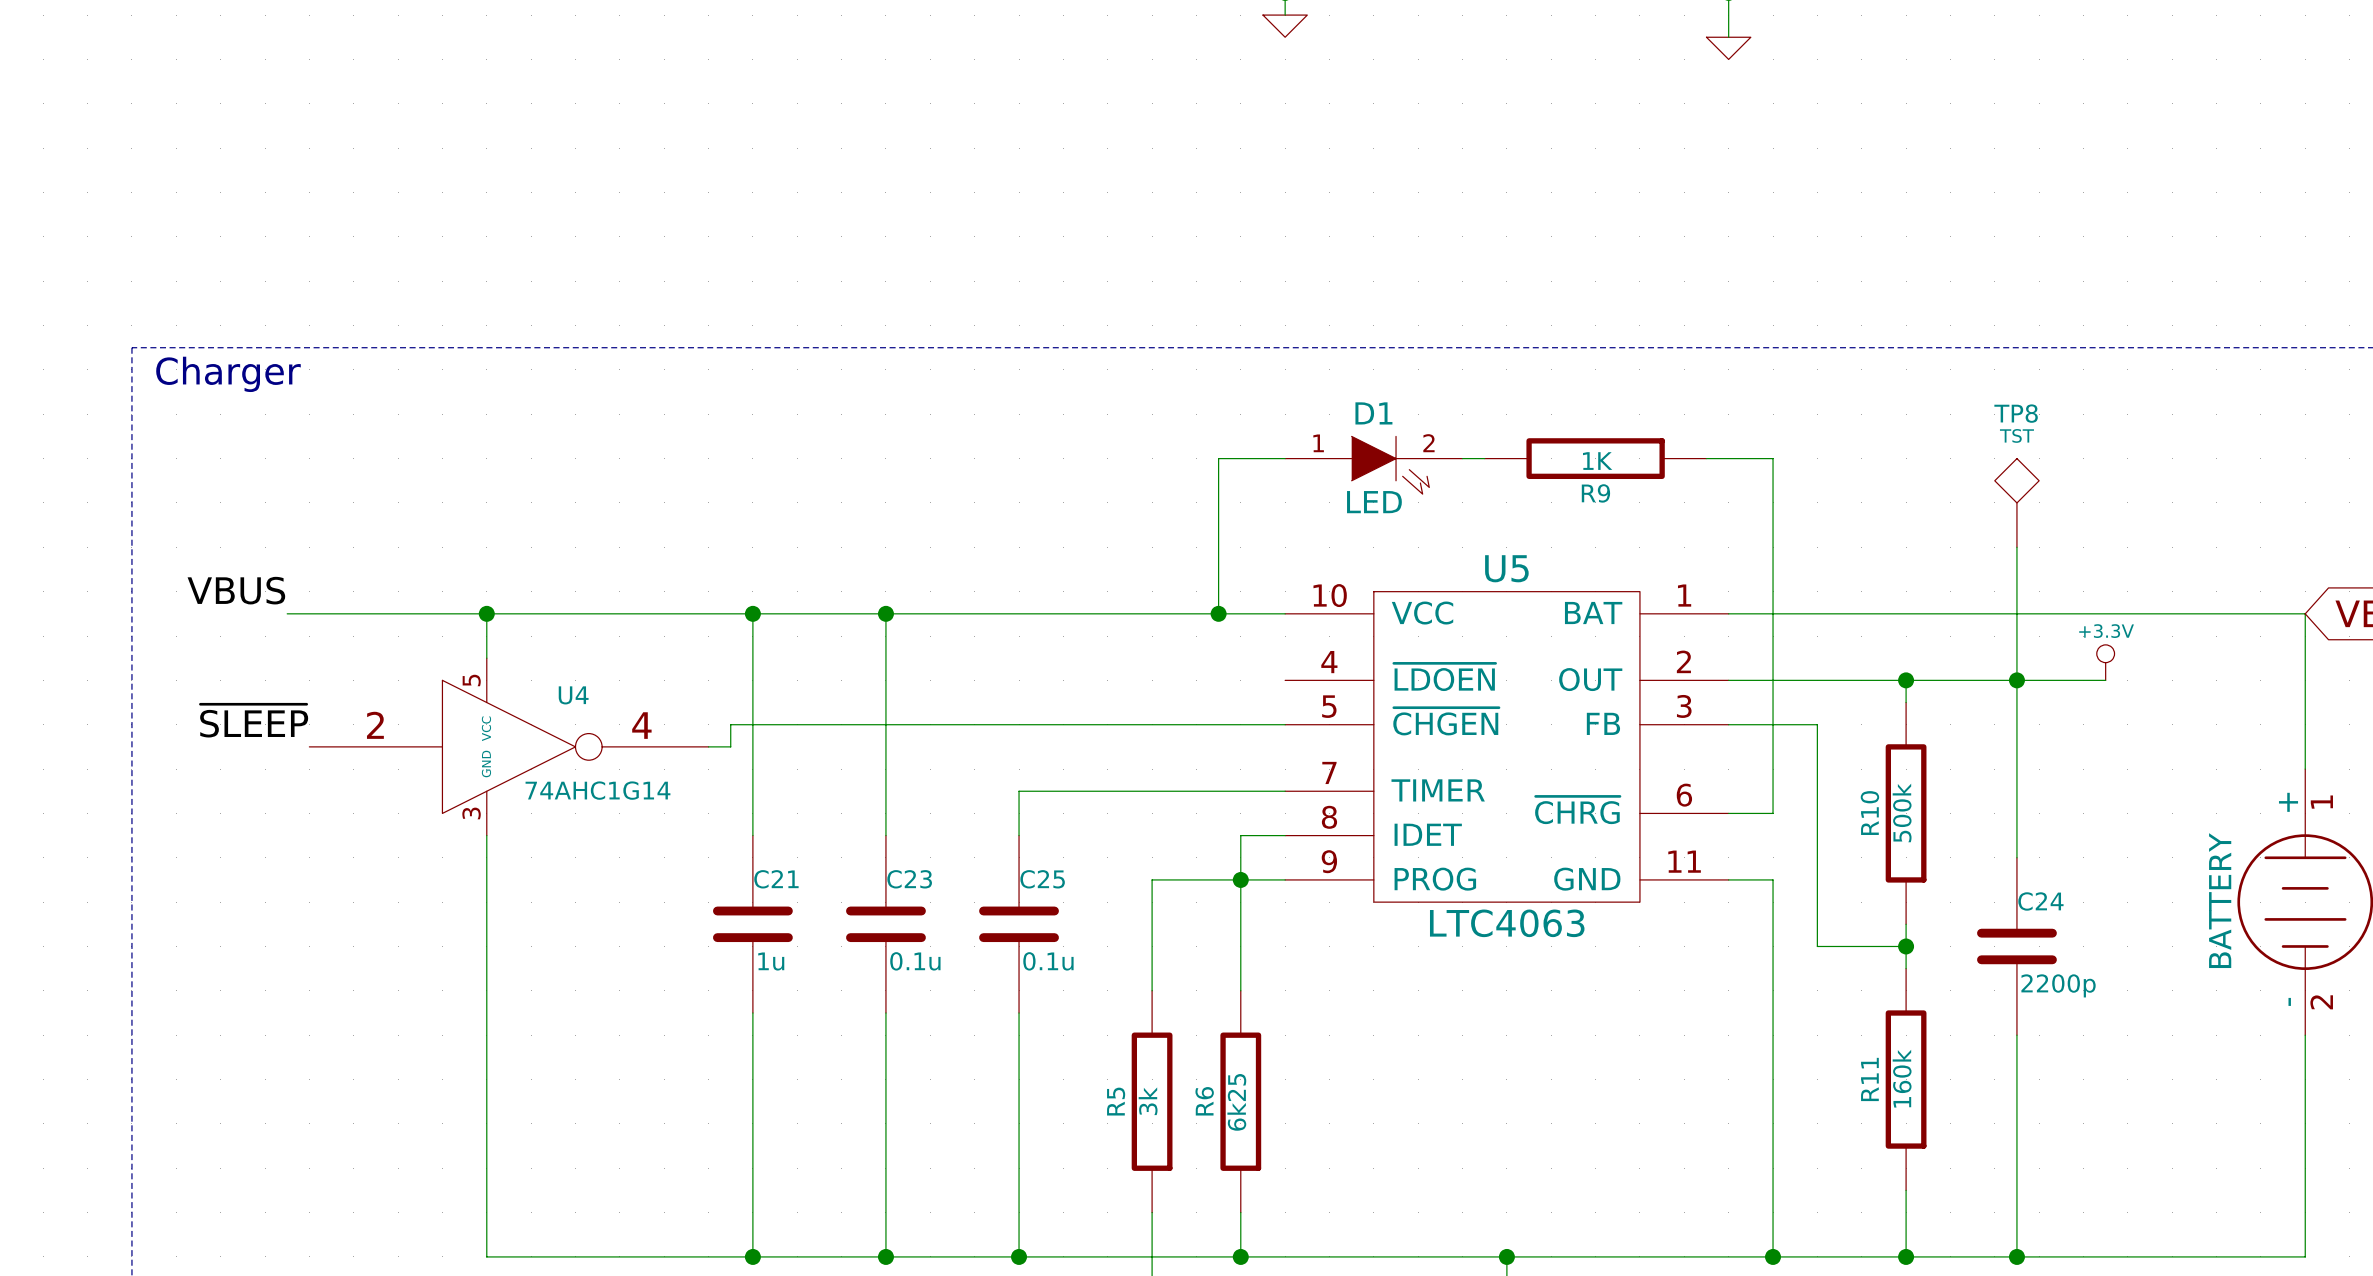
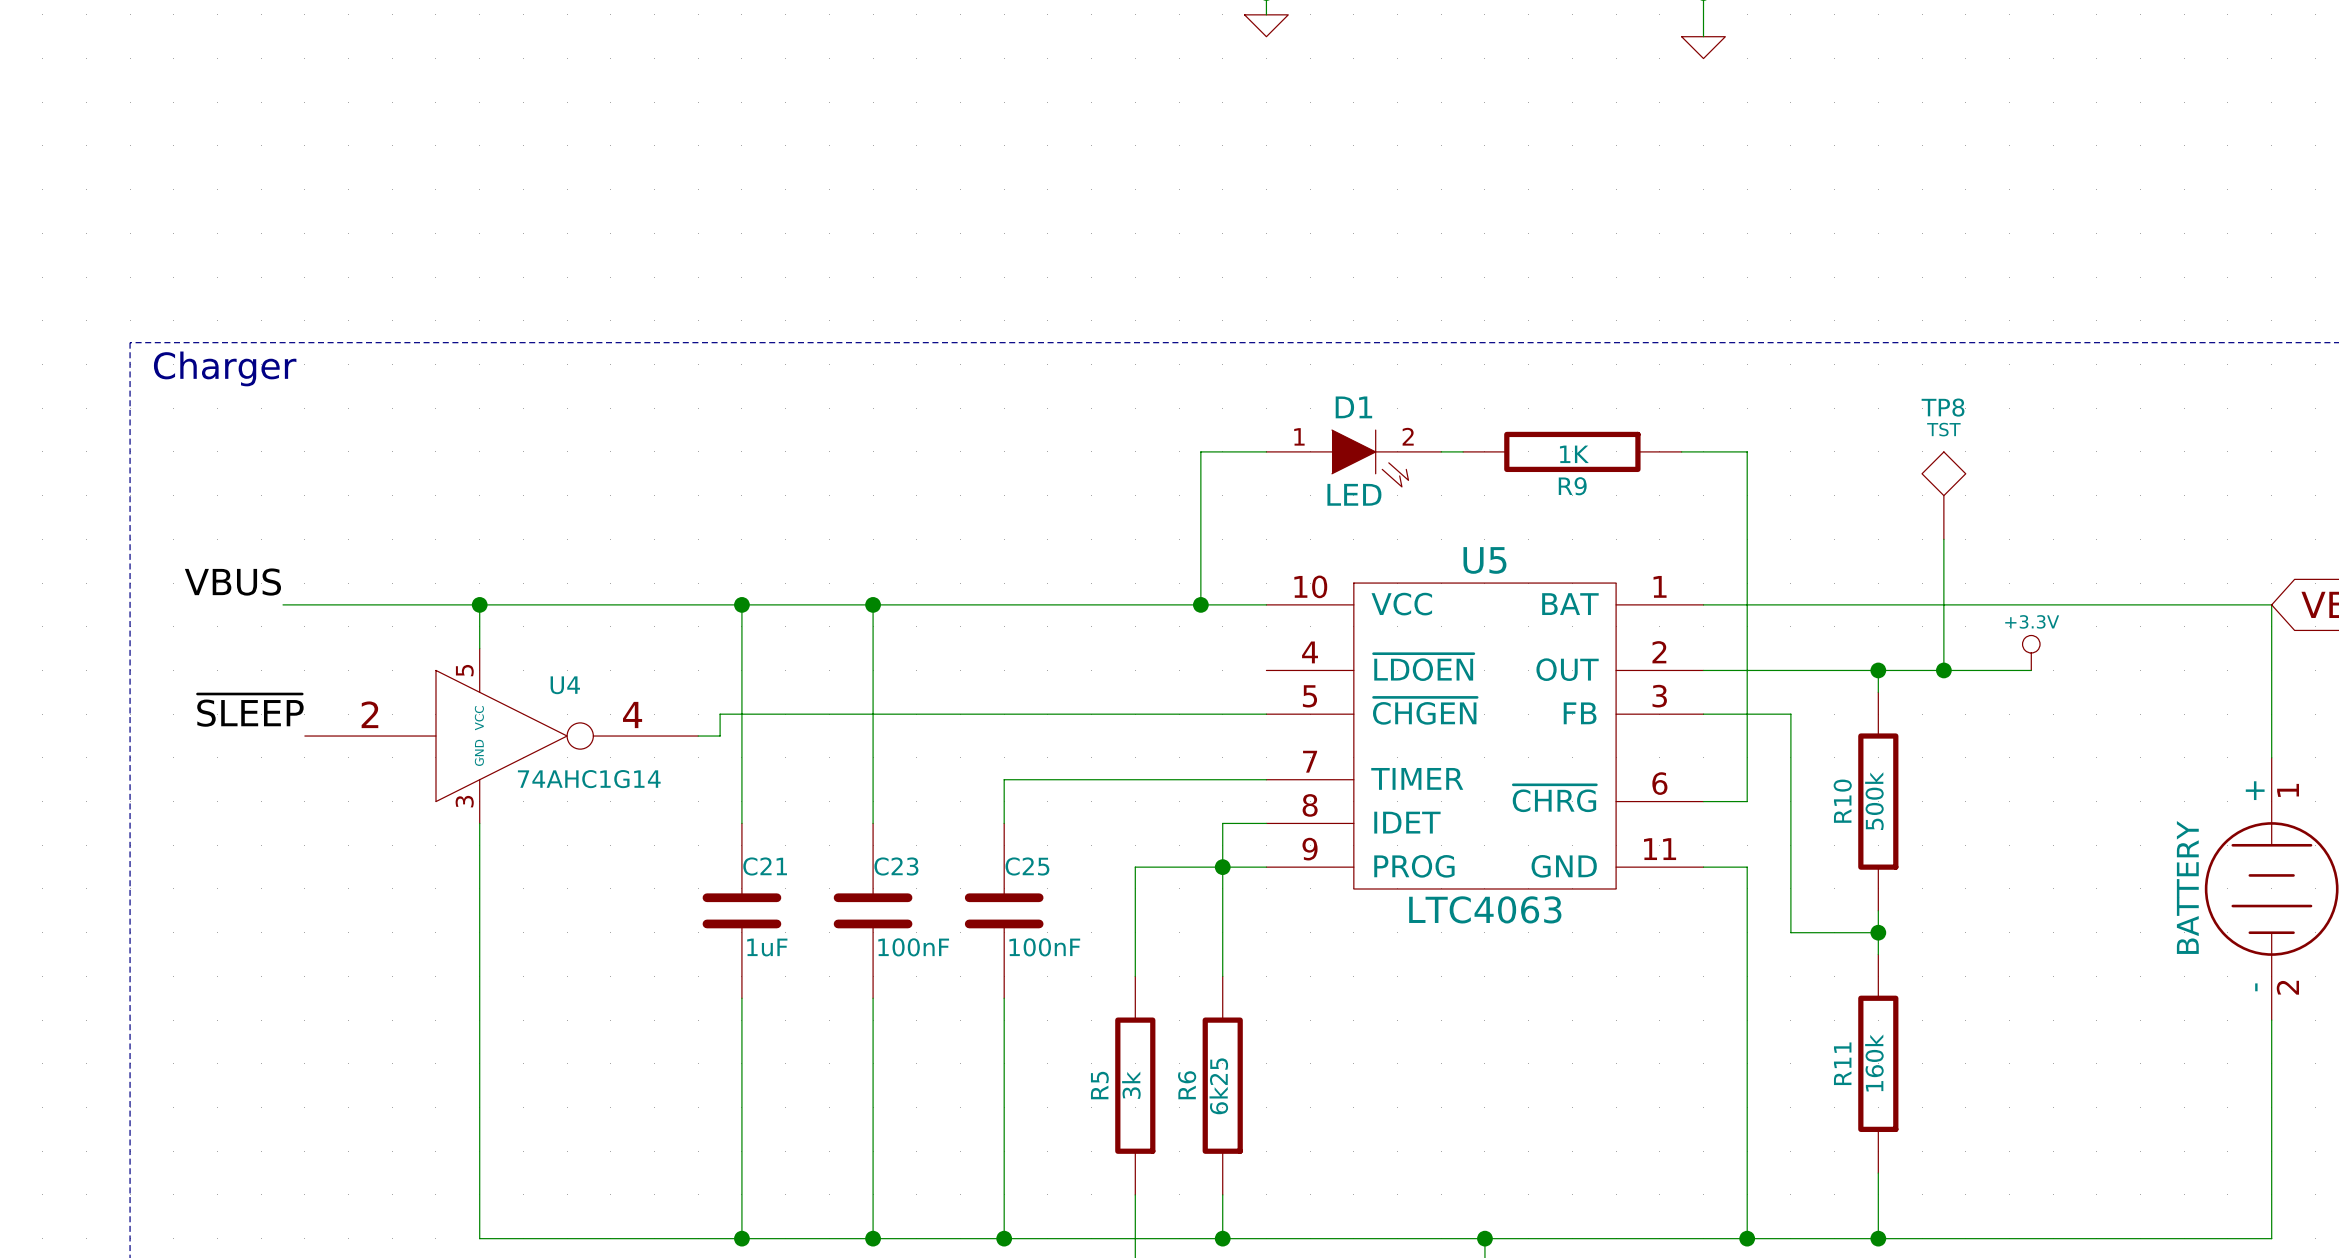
TP8 position: (2016, 502) -> (1943, 495)
wire: none -> (1943, 539) (1943, 670)
wire: (2016, 547) (2016, 857) -> none
power symbol position: +3.3V (2105, 662) -> +3.3V (2031, 652)
junction position: (2016, 680) -> (1943, 670)
wire: (2061, 680) (2105, 680) -> none
C24: 2200p (2016, 946) -> none
C21 value: 1u (771, 961) -> 1uF (767, 947)
C23 value: 0.1u (915, 961) -> 100nF (913, 947)
C25 value: 0.1u (1048, 961) -> 100nF (1044, 947)
wire: (2016, 1035) (2016, 1256) -> none
junction: (2016, 1256) -> none

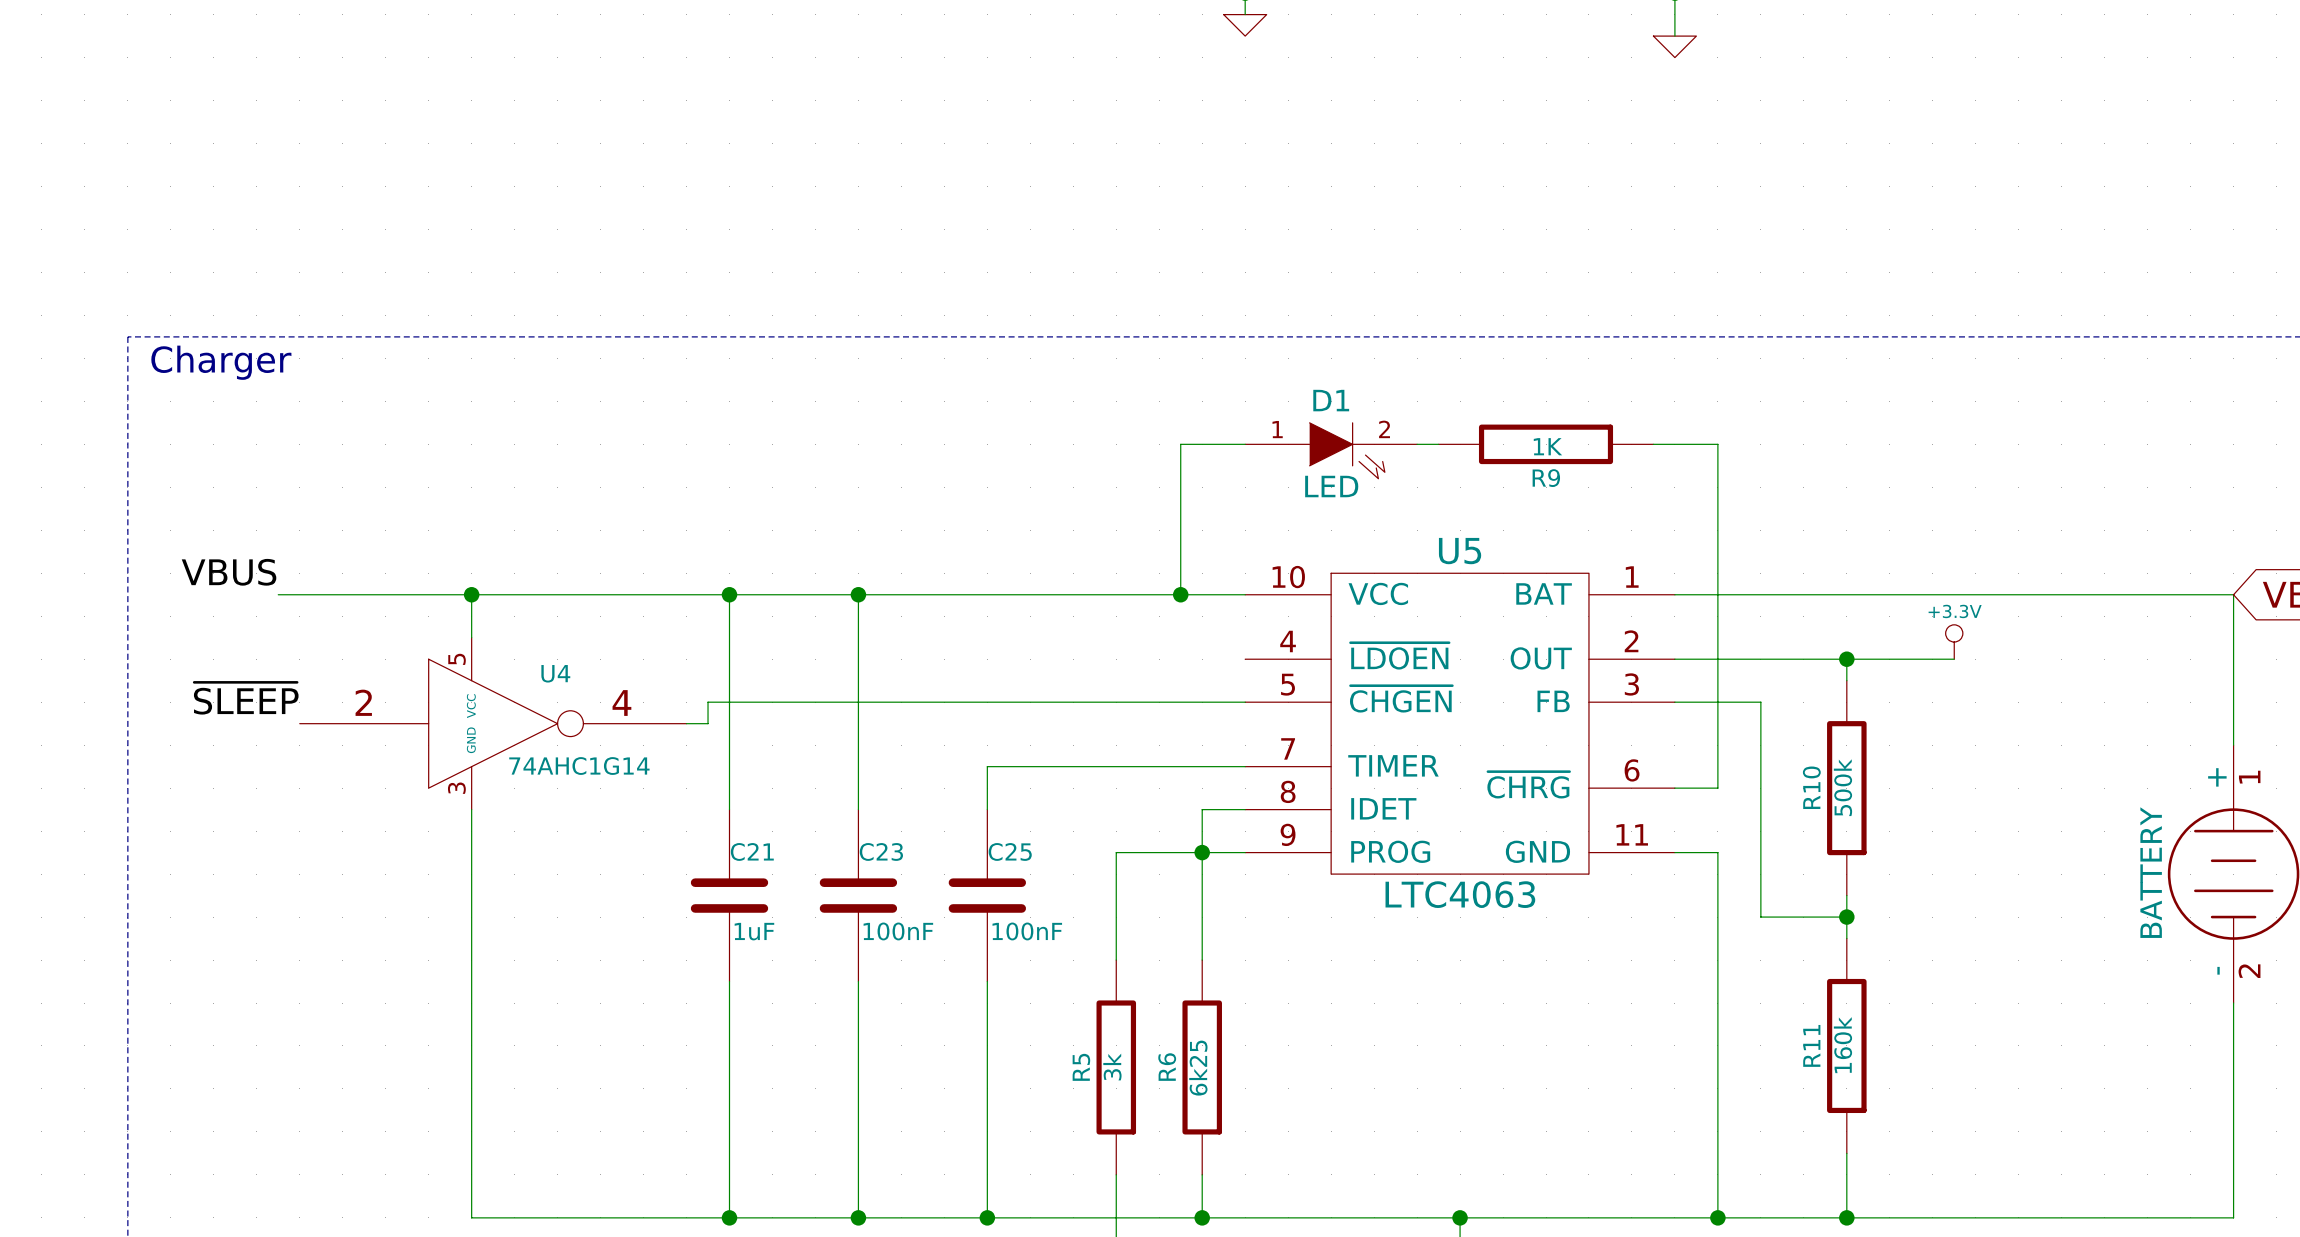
TP8: TST (1943, 495) -> none
wire: (1943, 539) (1943, 670) -> none
power symbol position: +3.3V (2031, 652) -> +3.3V (1954, 642)
junction: (1943, 670) -> none
wire: (1987, 670) (2031, 670) -> none

